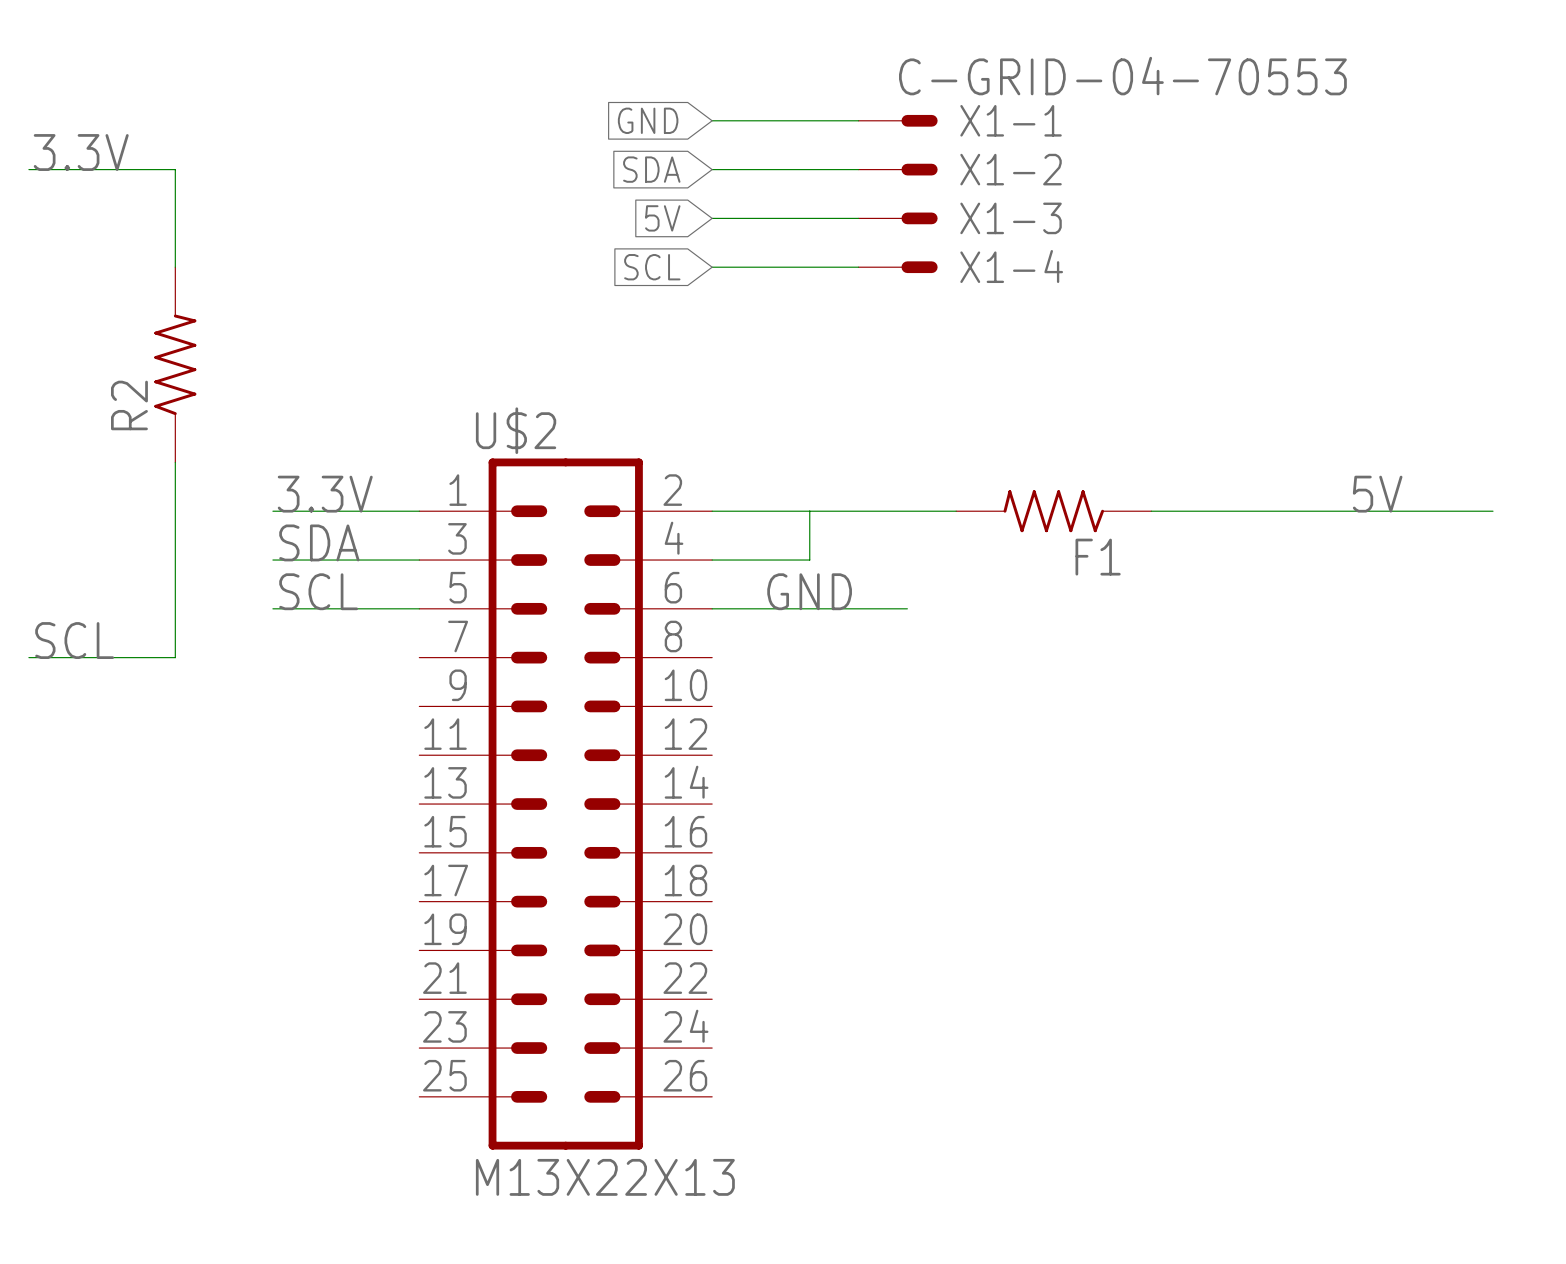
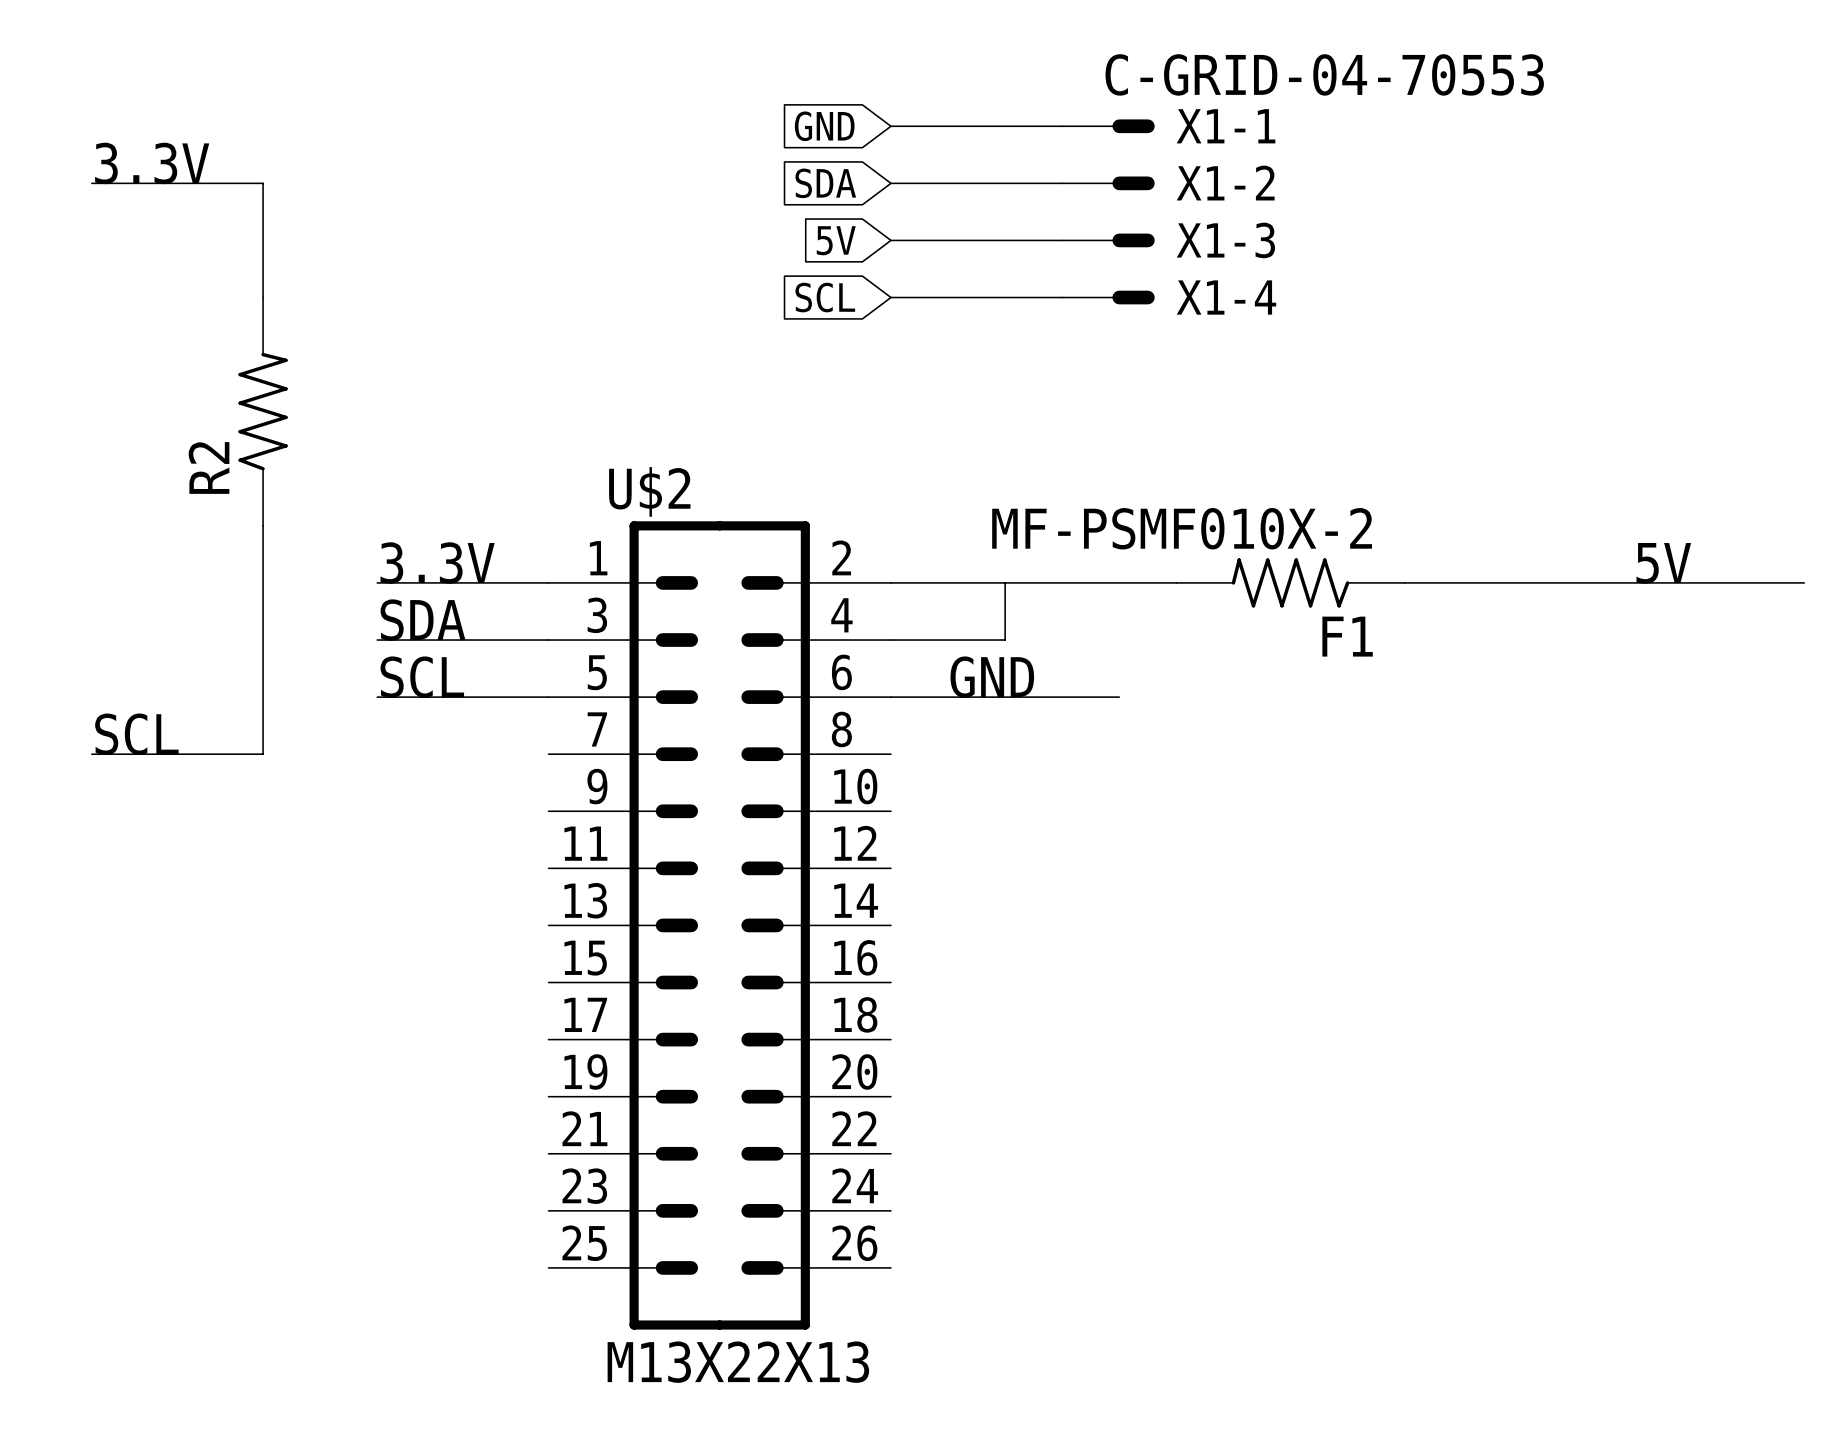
F1 value: none -> MF-PSMF010X-2 (1182, 528)

